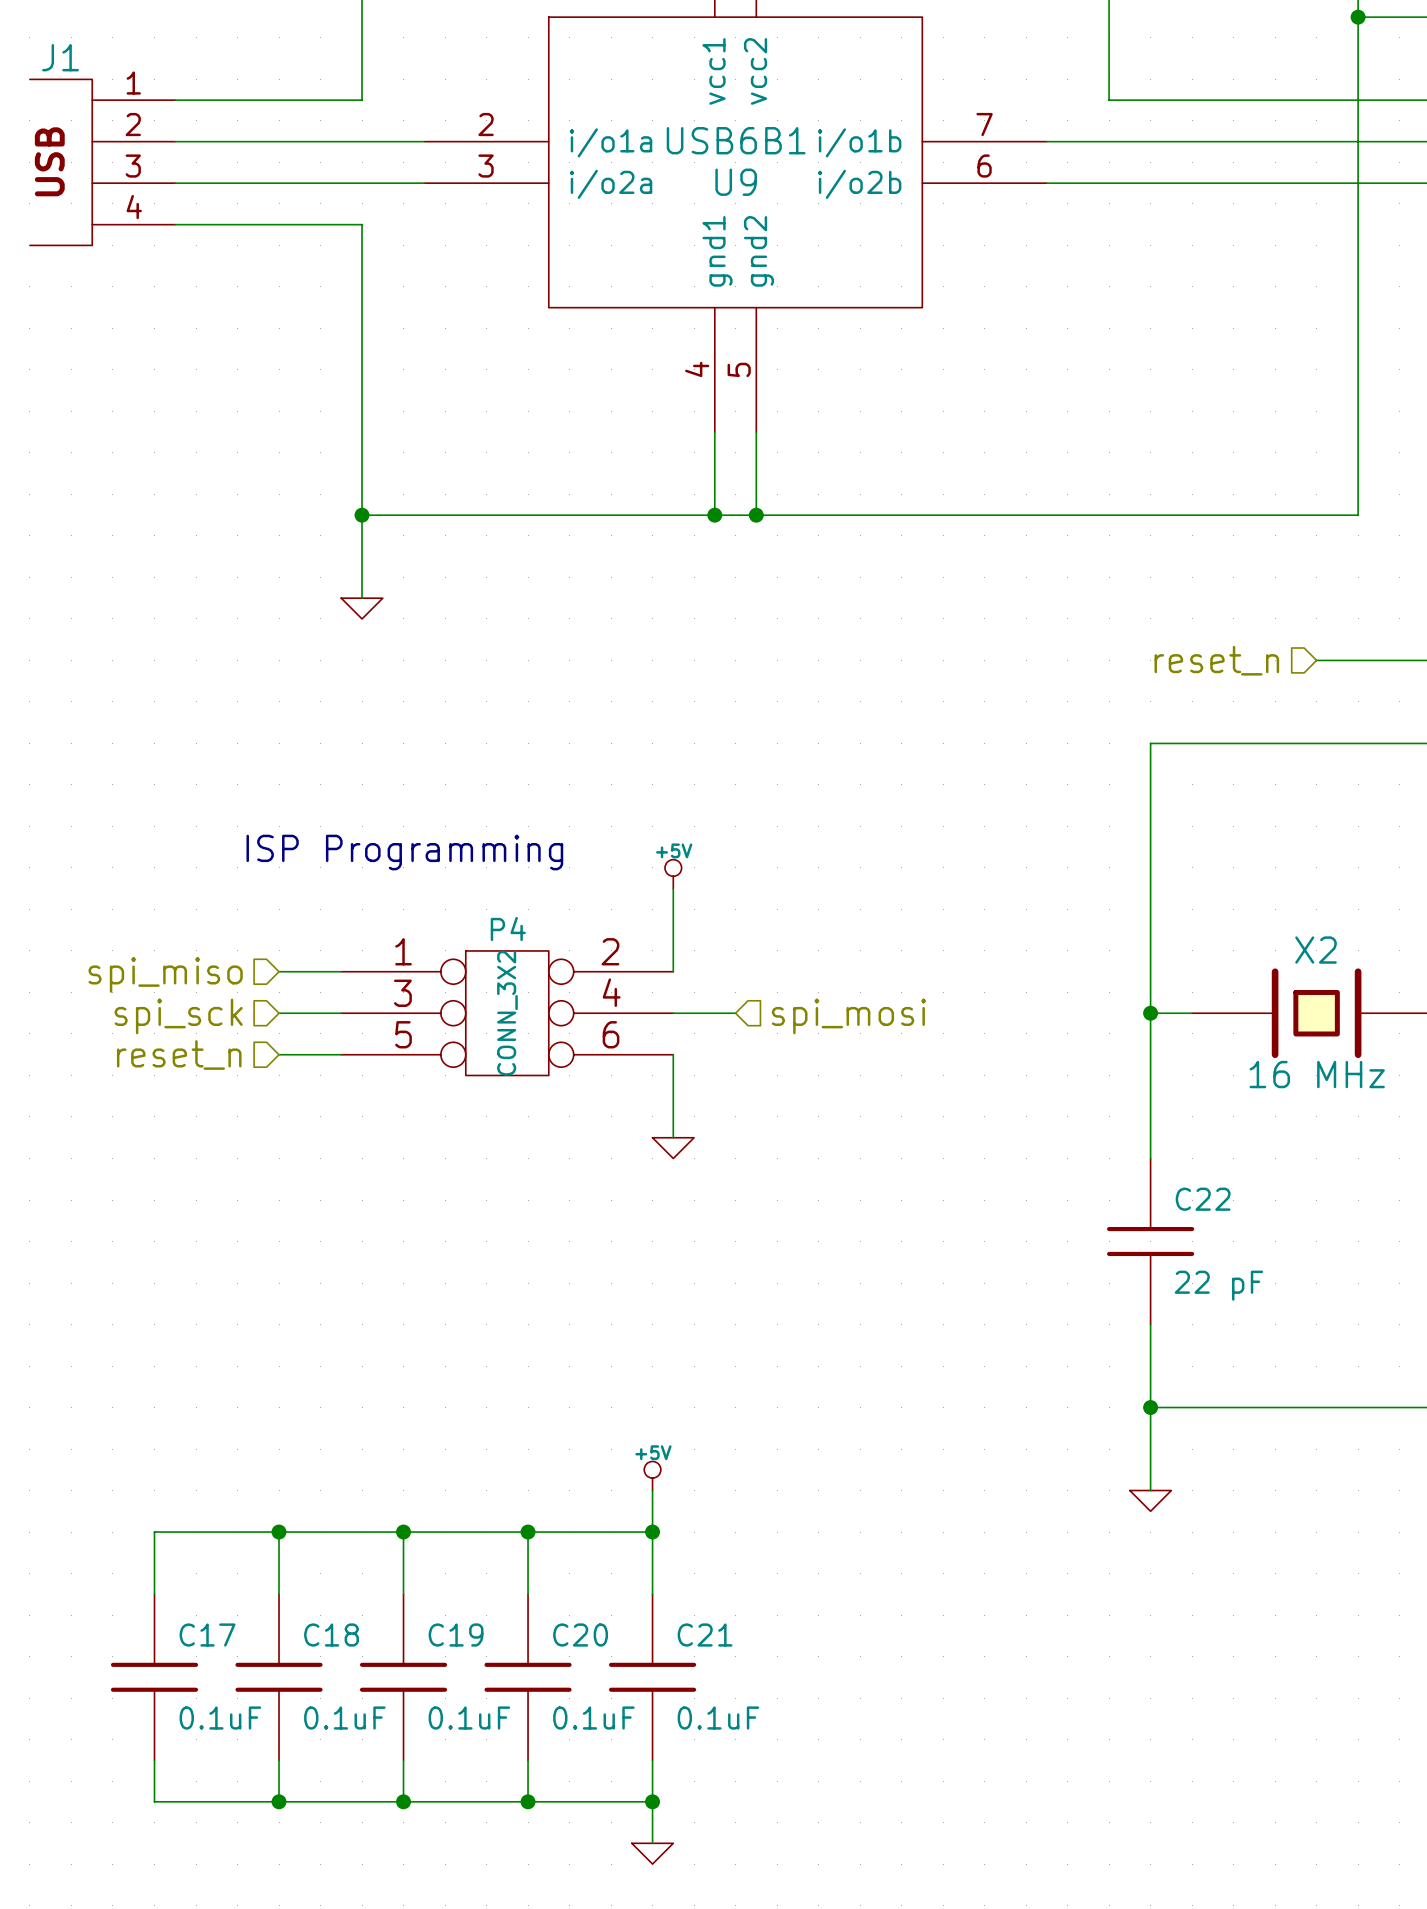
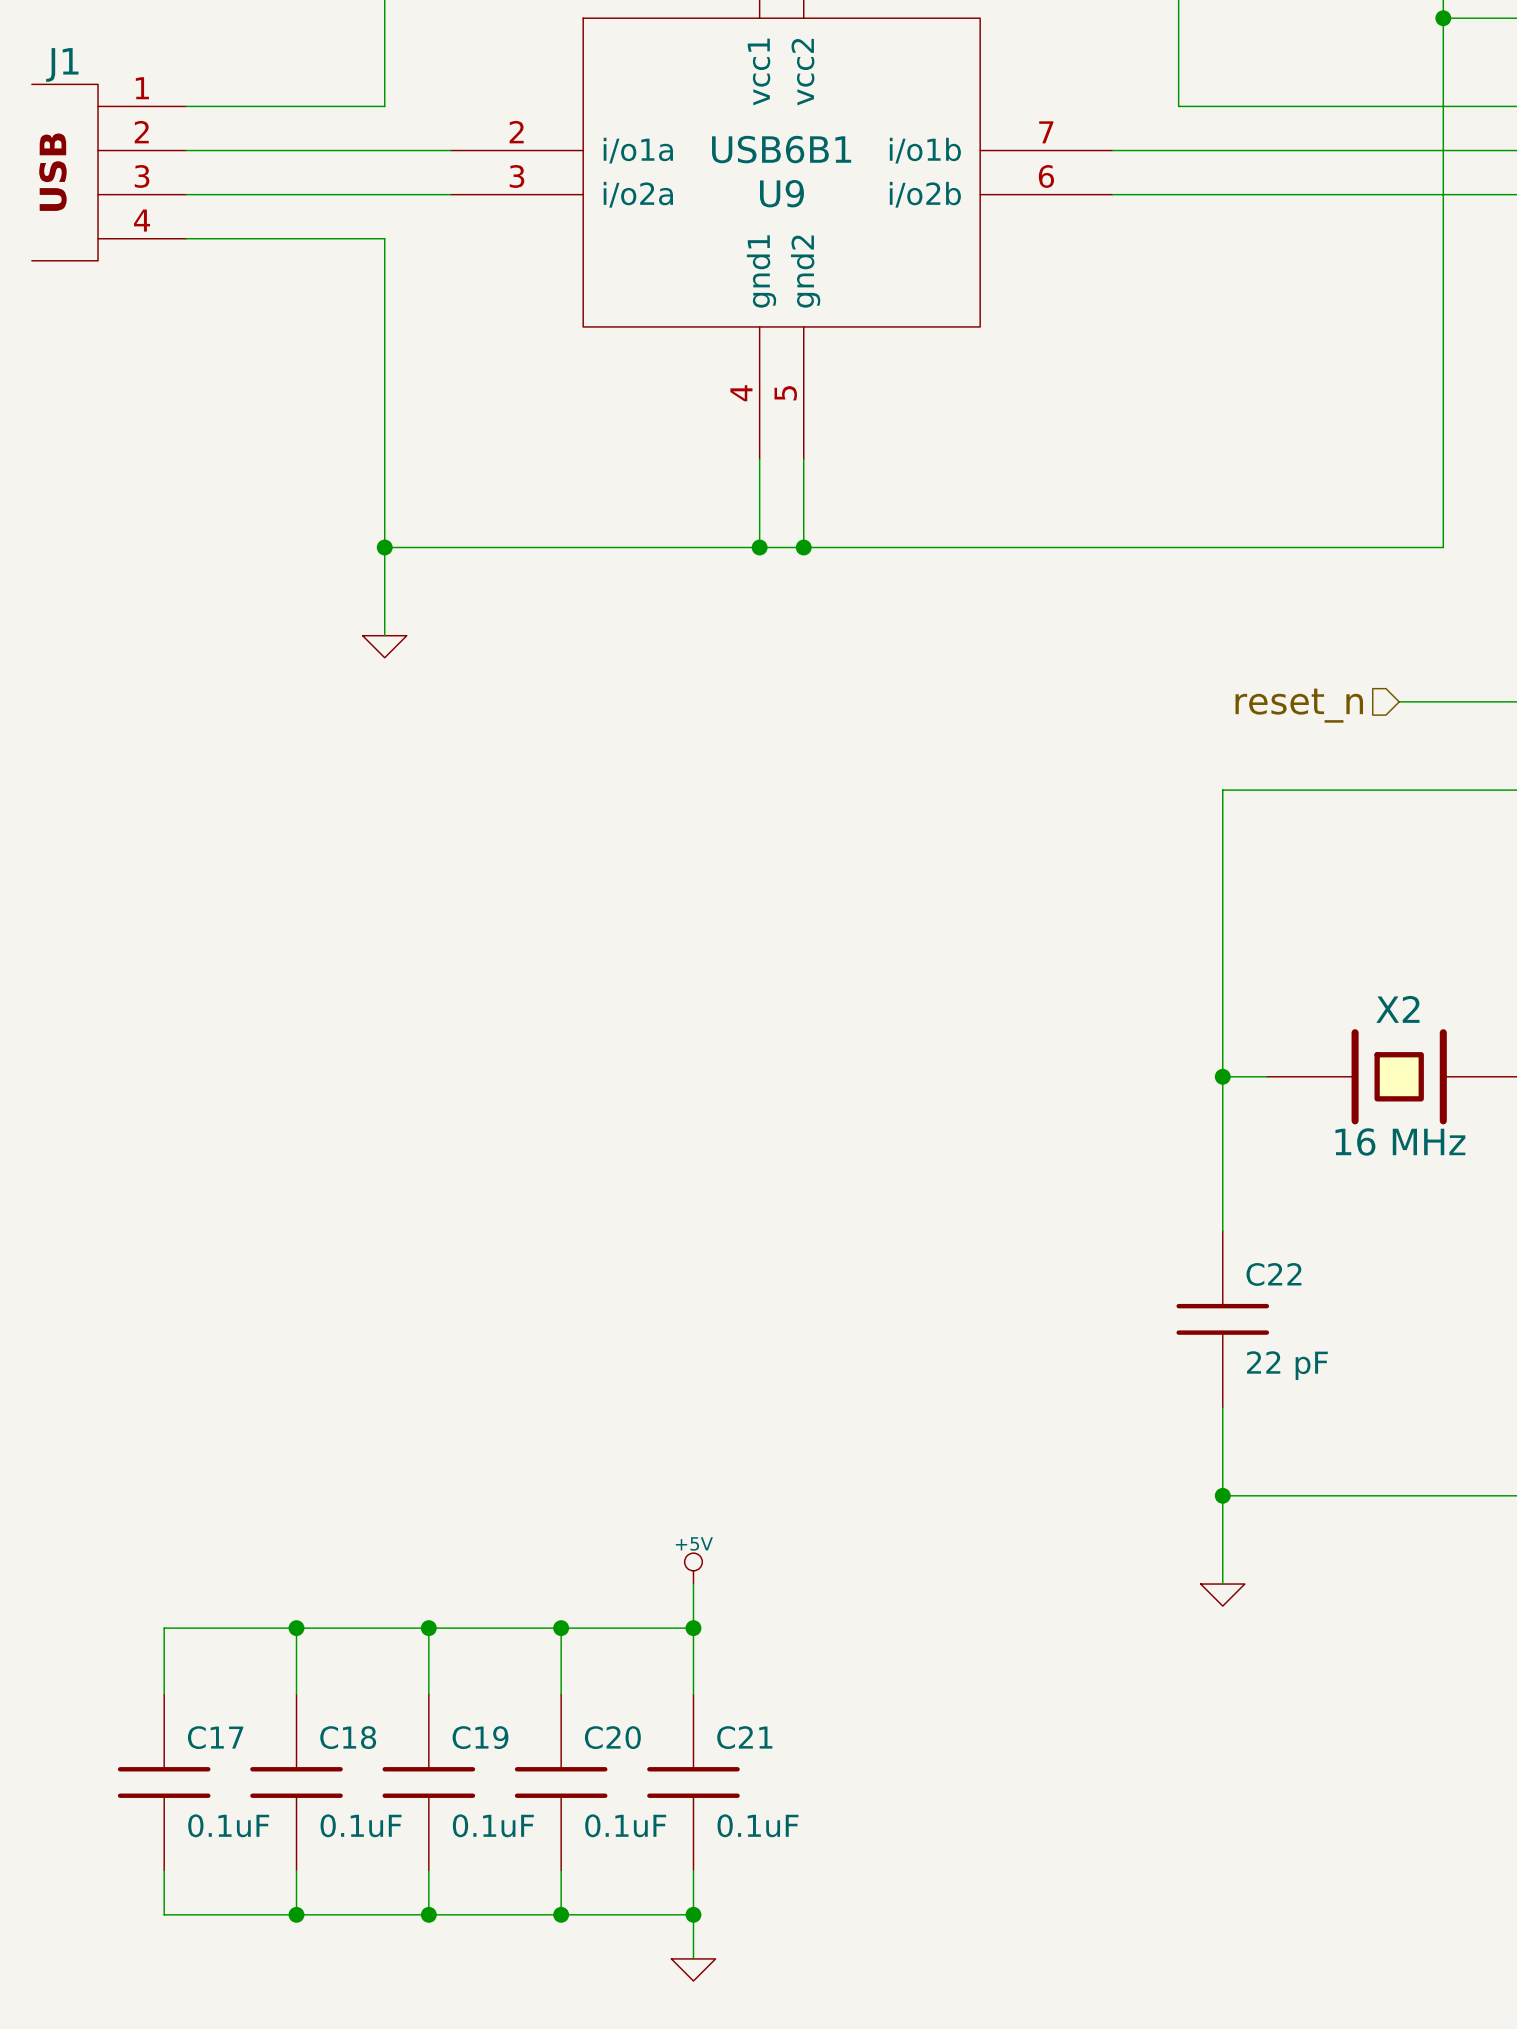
text: ISP Programming (404, 852) -> none
power symbol: +5V (673, 874) -> none
wire: (673, 888) (673, 971) -> none
wire: (279, 971) (341, 971) -> none
hierarchical label: spi_miso (165, 974) -> none
wire: (279, 1013) (341, 1013) -> none
P4: CONN_3X2 (507, 1013) -> none
wire: (673, 1013) (735, 1013) -> none
hierarchical label: spi_sck (178, 1016) -> none
hierarchical label: spi_mosi (848, 1016) -> none
hierarchical label: reset_n (179, 1054) -> none
wire: (279, 1054) (341, 1054) -> none
wire: (673, 1054) (673, 1137) -> none
power symbol: (673, 1148) -> none

